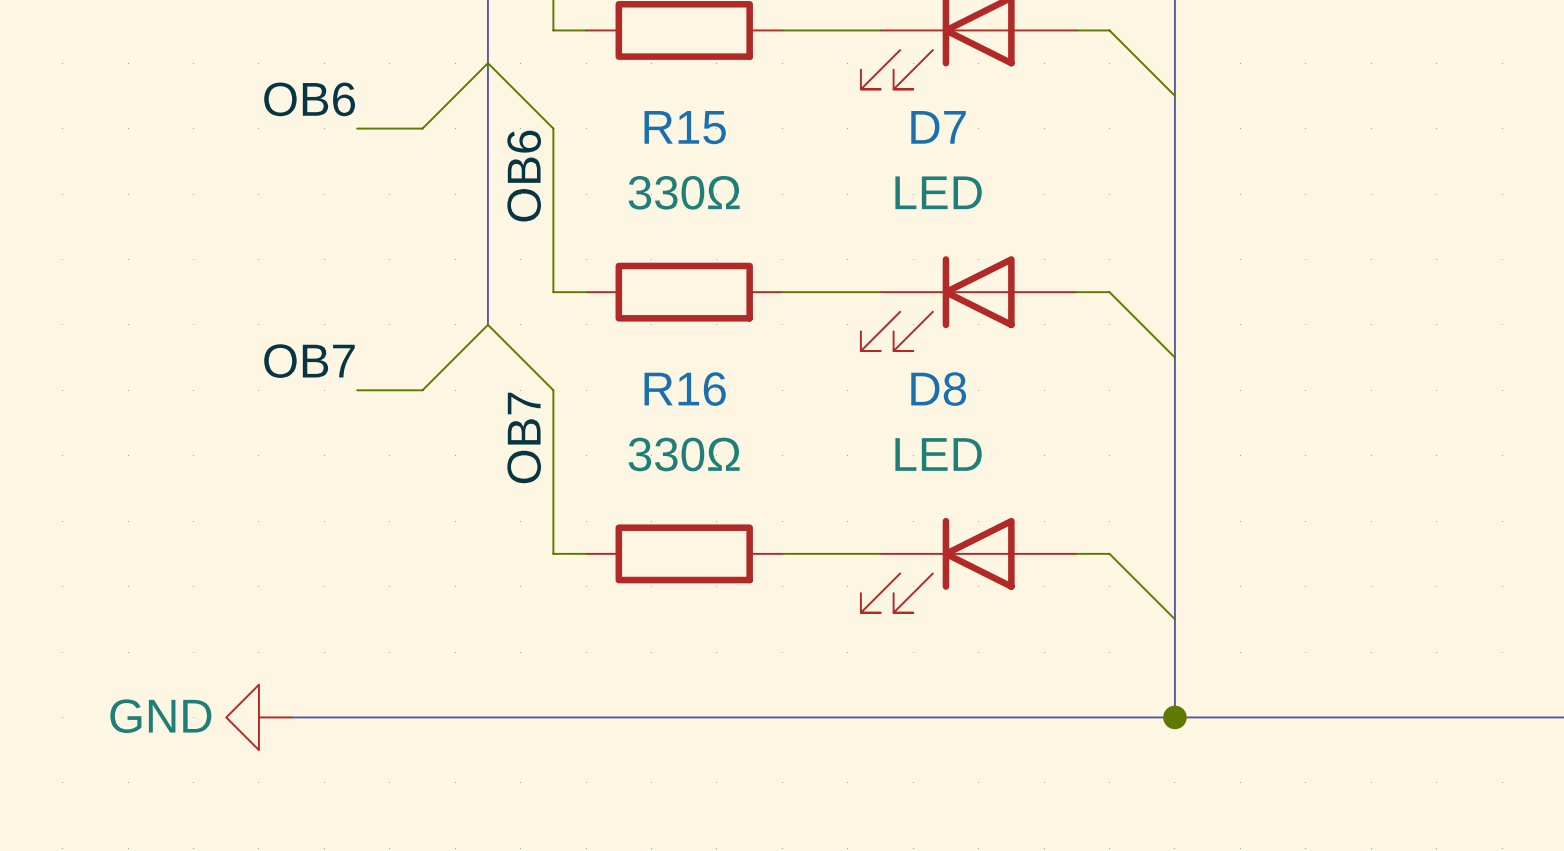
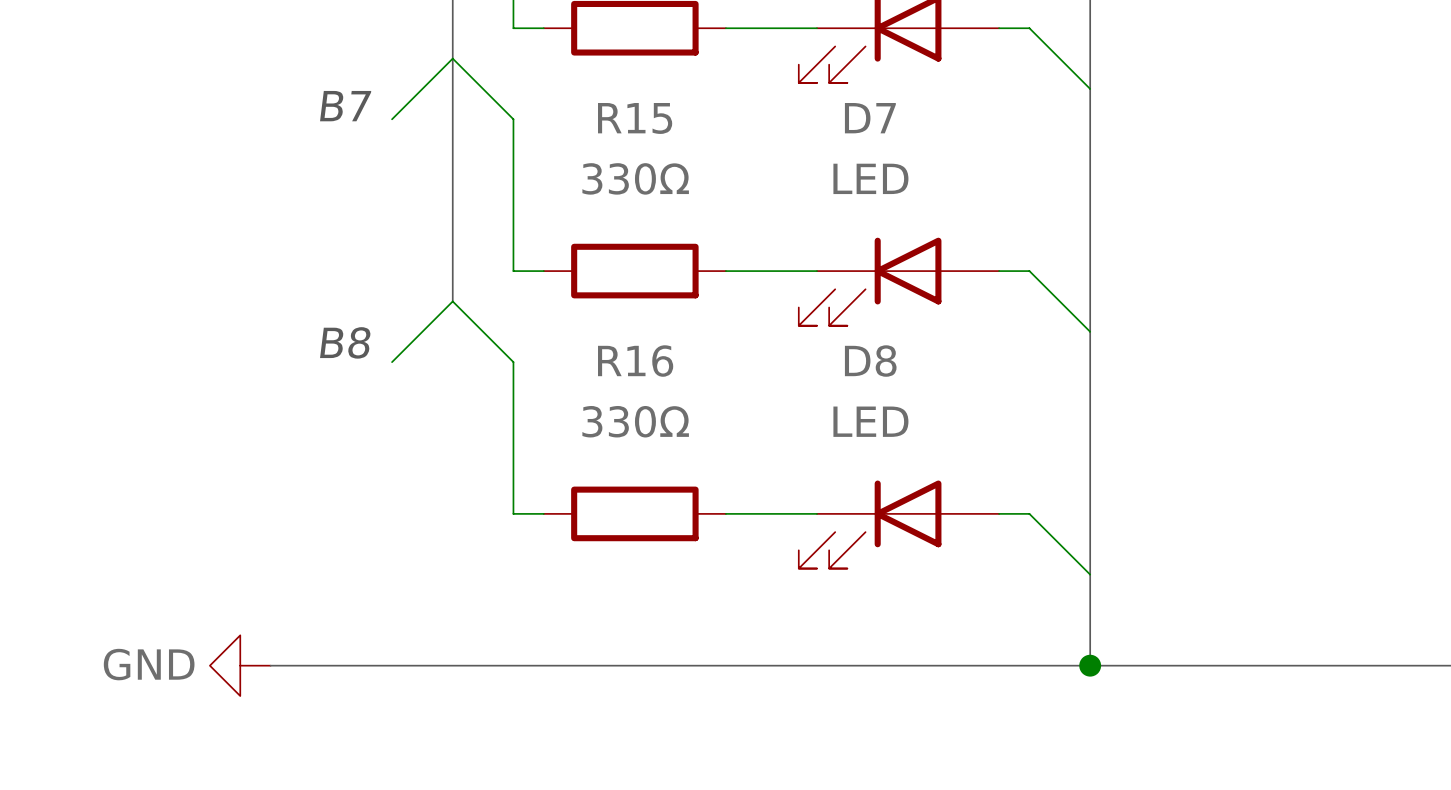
label: OB6 (309, 99) -> none
text: none -> B7 (345, 106)
wire: (357, 128) (422, 128) -> none
label: OB6 (524, 176) -> none
label: OB7 (309, 361) -> none
text: none -> B8 (345, 342)
wire: (357, 390) (422, 390) -> none
label: OB7 (524, 437) -> none

